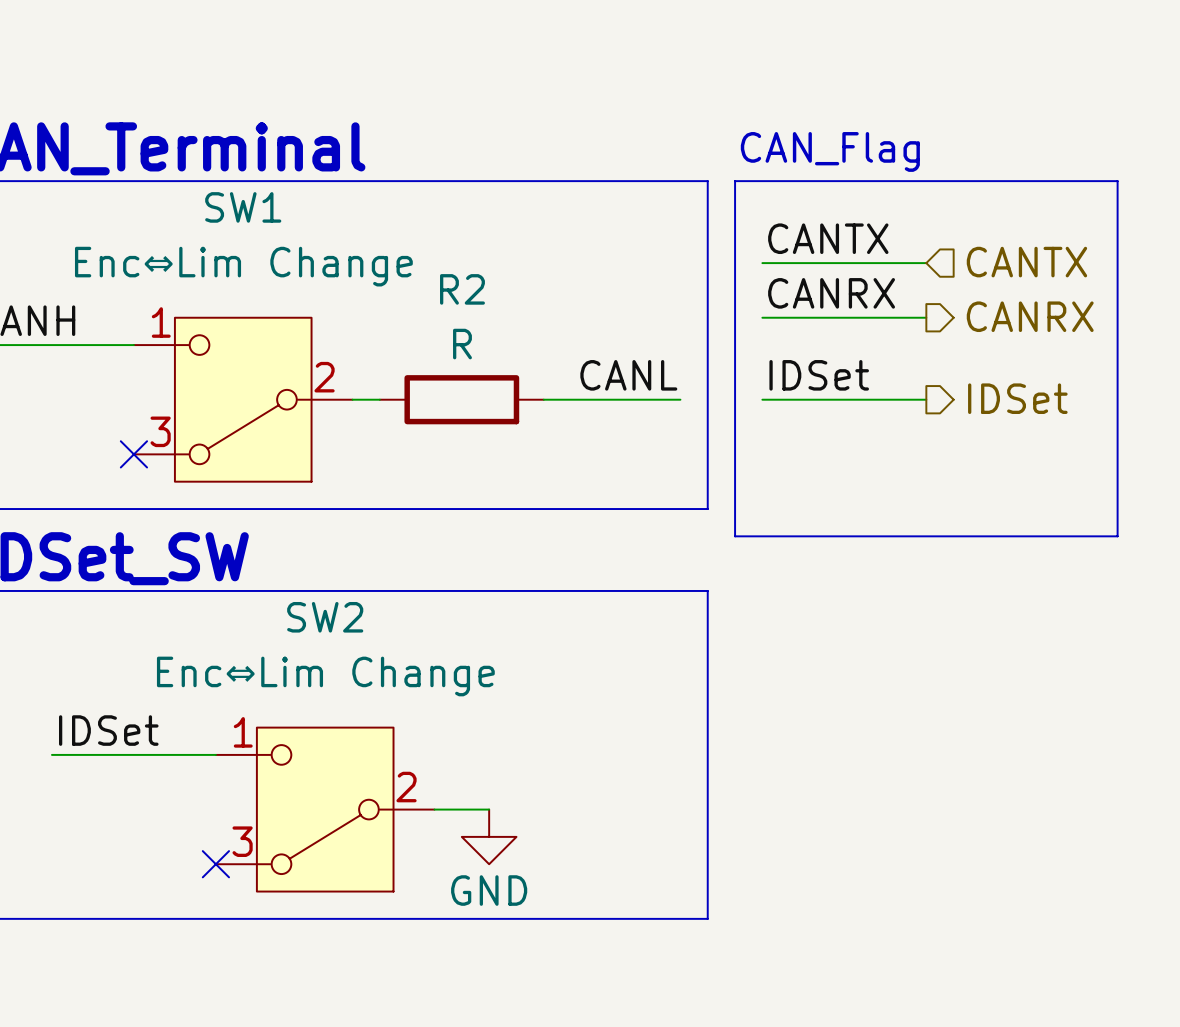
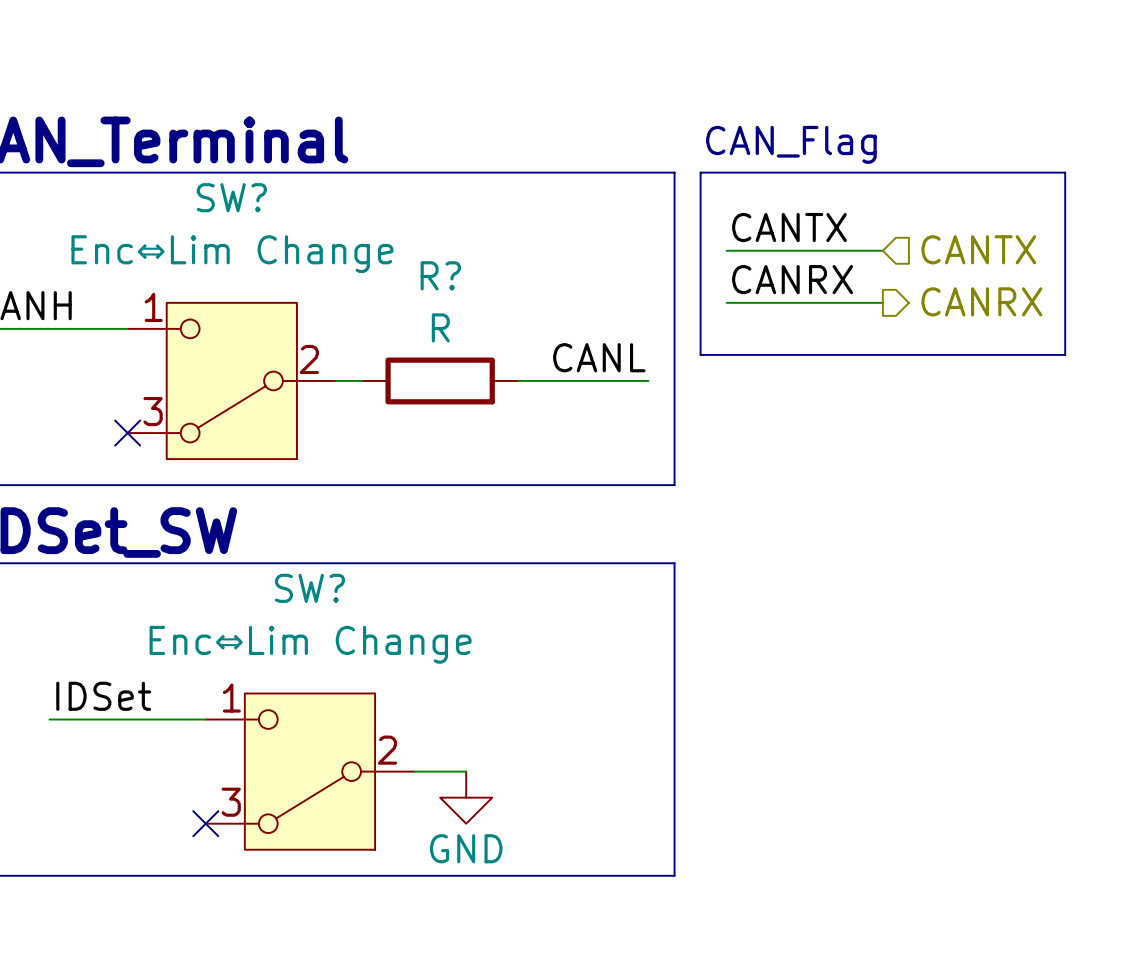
SW1 name: SW1 (243, 207) -> SW? (231, 197)
R2 name: R2 (462, 289) -> R? (440, 275)
line: (735, 372) (735, 536) (1117, 536) (1117, 372) -> (700, 354) (1065, 354)
label: IDSet (819, 375) -> none
hierarchical label: IDSet (1017, 398) -> none
wire: (762, 399) (926, 399) -> none
SW2 name: SW2 (325, 617) -> SW? (309, 588)

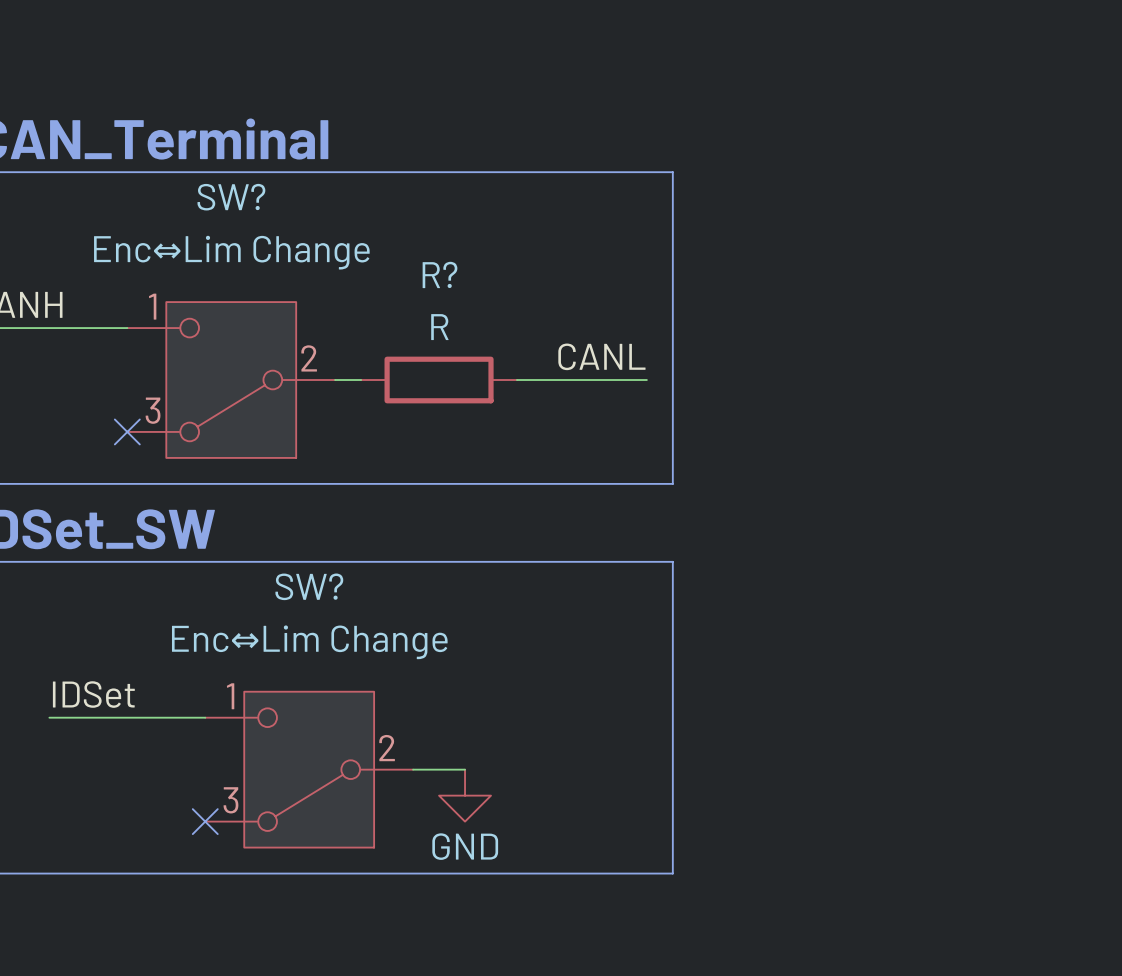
text: CAN_Flag (791, 144) -> none
line: (700, 172) (1065, 172) (1065, 354) (700, 354) (700, 172) -> none
label: CANTX (789, 227) -> none
hierarchical label: CANTX (978, 249) -> none
wire: (726, 250) (882, 250) -> none
label: CANRX (792, 279) -> none
hierarchical label: CANRX (981, 301) -> none
wire: (726, 302) (882, 302) -> none

